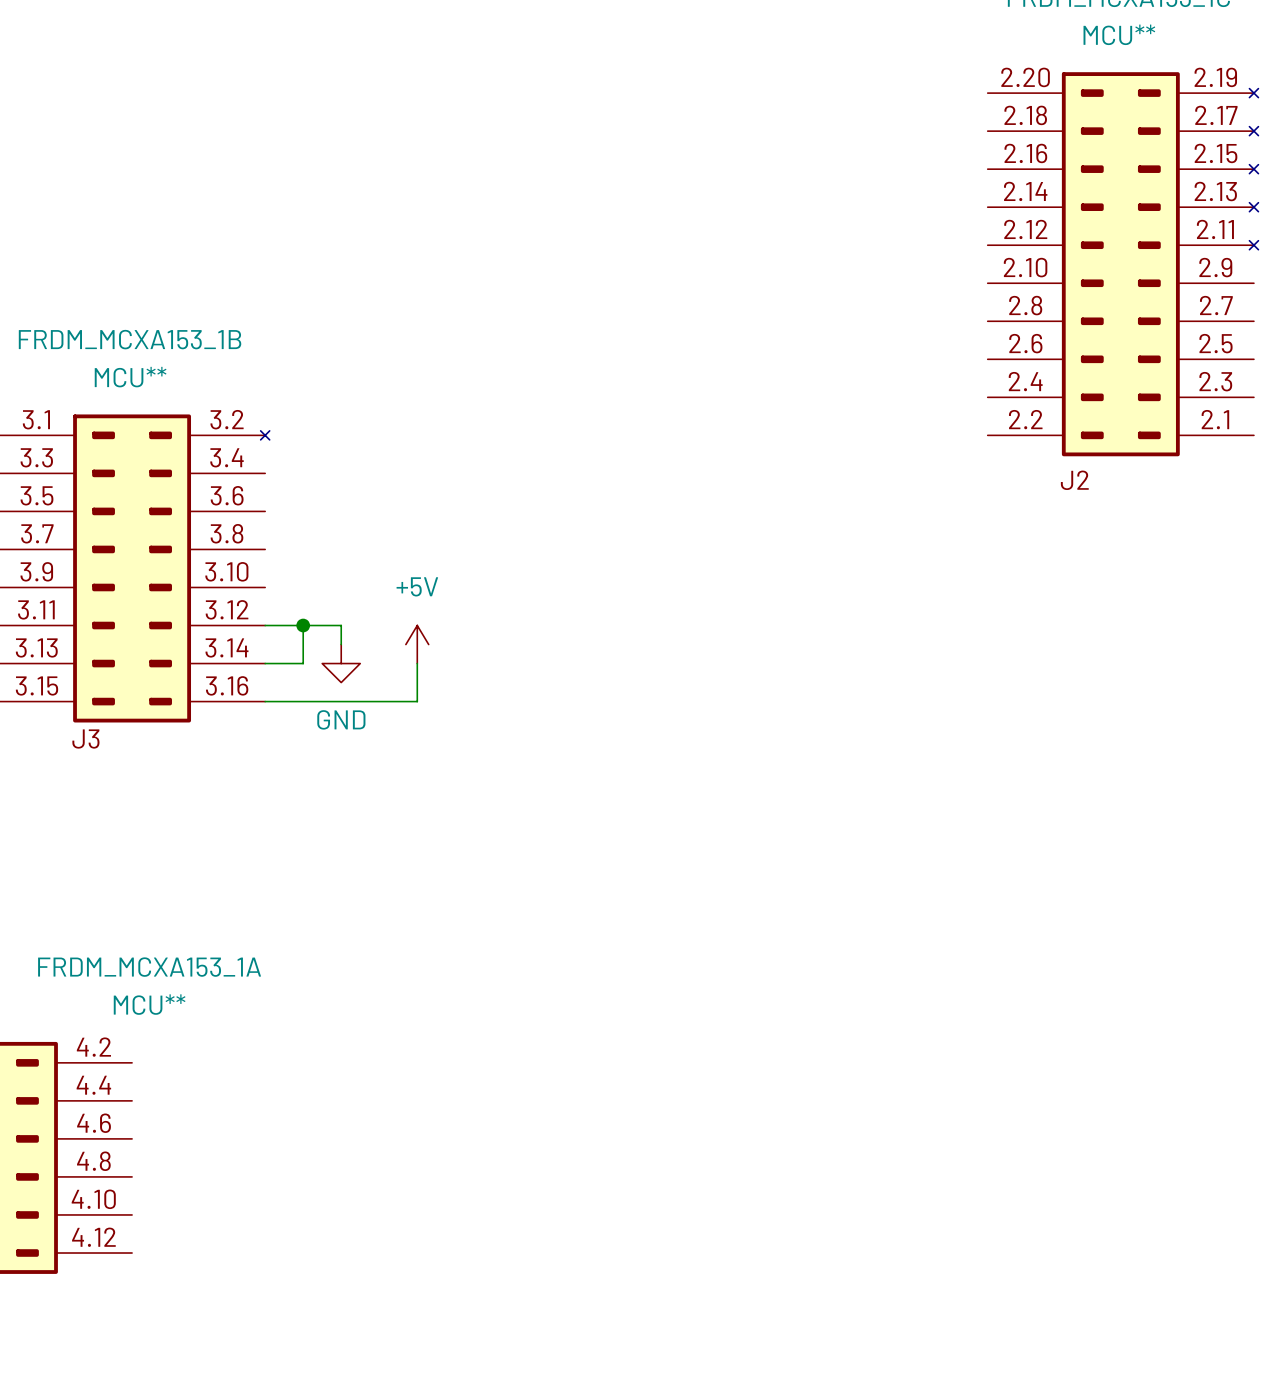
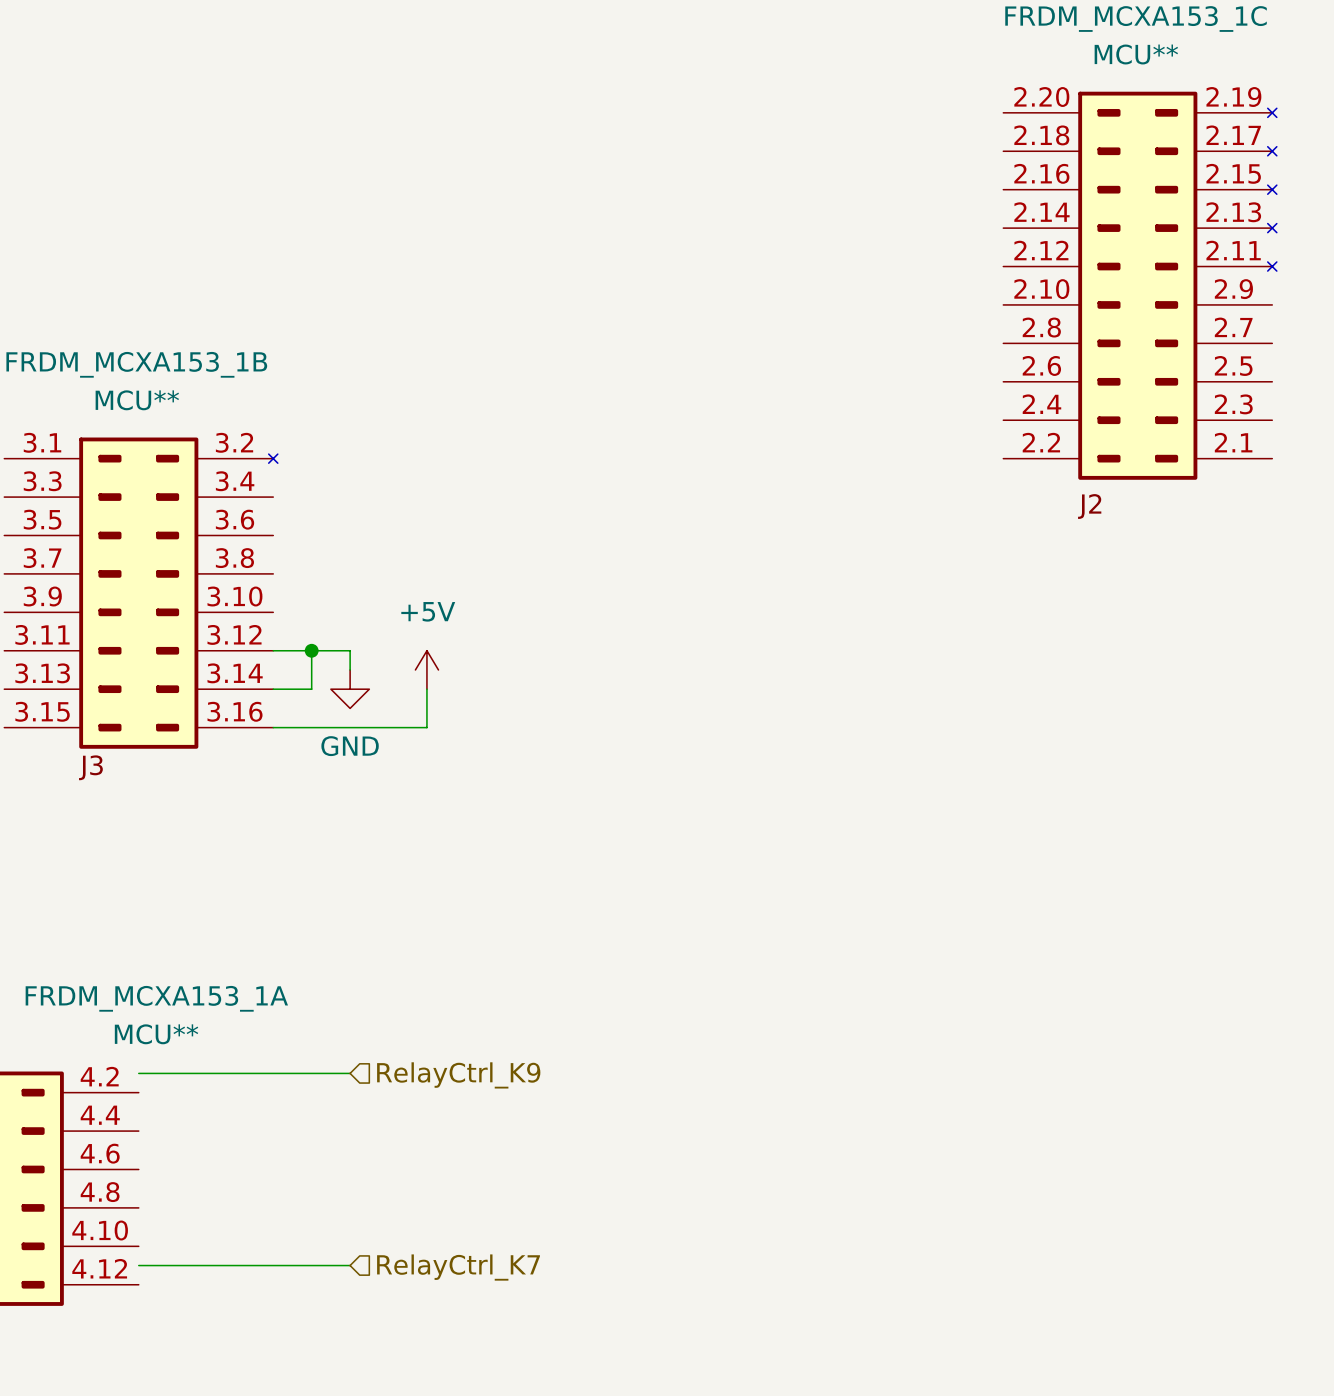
wire: none -> (138, 1073) (350, 1073)
hierarchical label: none -> RelayCtrl_K9 (458, 1075)
wire: none -> (138, 1265) (350, 1265)
hierarchical label: none -> RelayCtrl_K7 (458, 1267)

